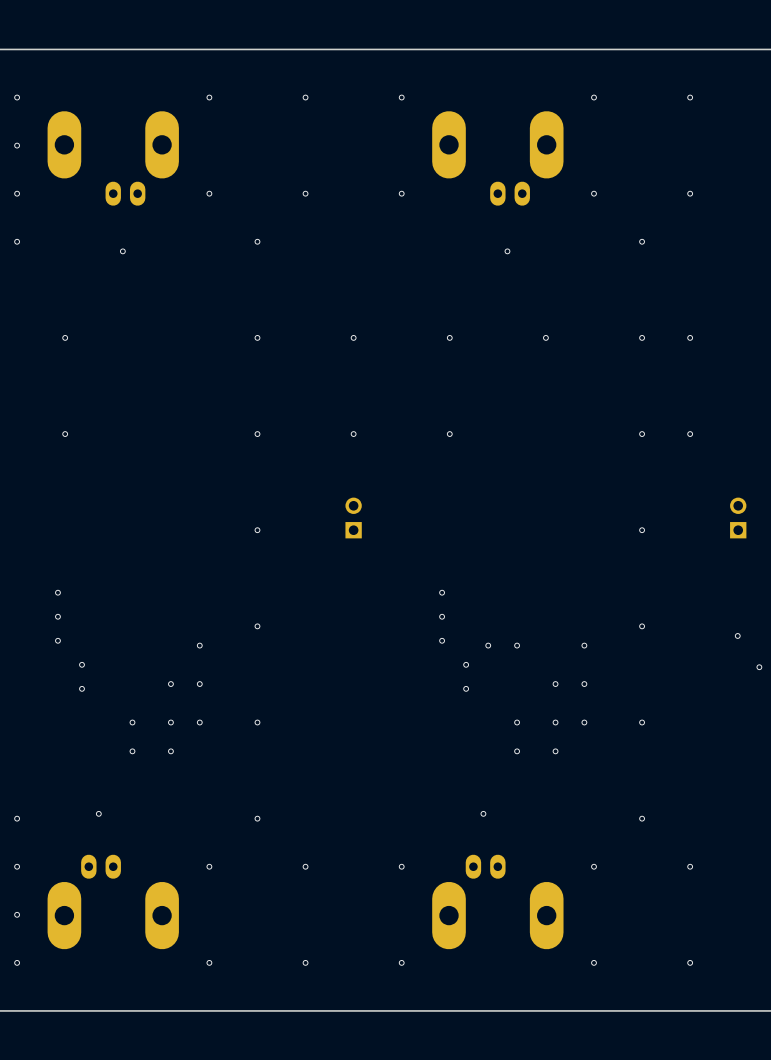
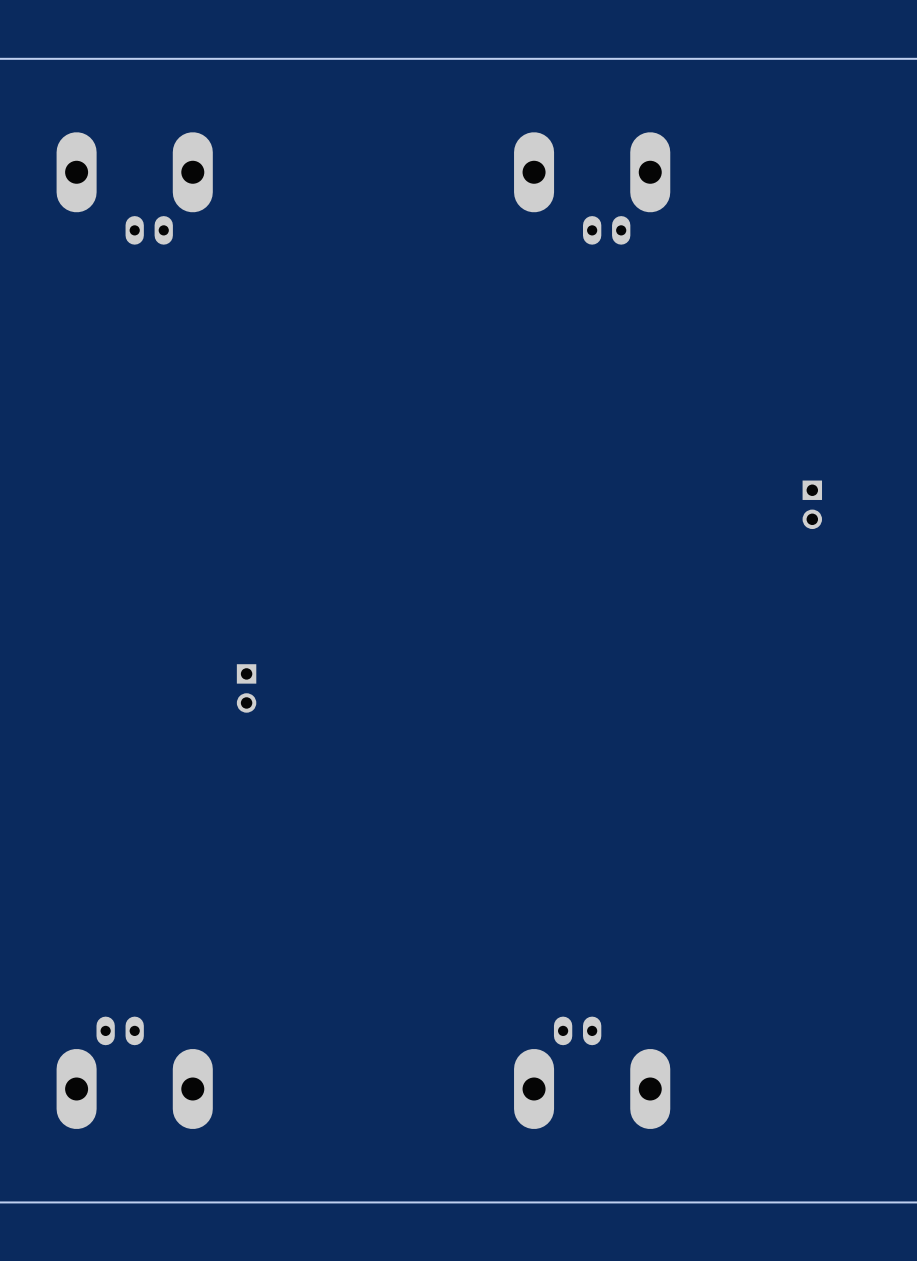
via: (17, 97) -> none
via: (209, 97) -> none
via: (305, 97) -> none
via: (401, 97) -> none
via: (594, 97) -> none
via: (690, 97) -> none
via: (17, 145) -> none
via: (17, 193) -> none
via: (209, 193) -> none
via: (305, 193) -> none
via: (401, 193) -> none
via: (594, 193) -> none
via: (690, 193) -> none
via: (17, 241) -> none
via: (257, 241) -> none
via: (642, 241) -> none
via: (122, 251) -> none
via: (507, 251) -> none
via: (65, 337) -> none
via: (257, 337) -> none
via: (353, 337) -> none
via: (449, 337) -> none
via: (545, 337) -> none
via: (642, 337) -> none
via: (690, 337) -> none
via: (65, 434) -> none
via: (257, 434) -> none
via: (353, 434) -> none
via: (449, 434) -> none
via: (642, 434) -> none
via: (690, 434) -> none
part rotation: 0° (353, 517) -> 180° (246, 688)
part position: (353, 517) -> (246, 688)
part rotation: 0° (738, 517) -> 180° (812, 504)
part position: (738, 517) -> (812, 504)
via: (257, 530) -> none
via: (642, 530) -> none
via: (57, 592) -> none
via: (442, 592) -> none
via: (57, 616) -> none
via: (442, 616) -> none
via: (257, 626) -> none
via: (642, 626) -> none
via: (737, 635) -> none
via: (57, 640) -> none
via: (442, 640) -> none
via: (199, 645) -> none
via: (488, 645) -> none
via: (517, 645) -> none
via: (584, 645) -> none
via: (82, 664) -> none
via: (466, 664) -> none
via: (759, 667) -> none
via: (170, 684) -> none
via: (199, 684) -> none
via: (555, 684) -> none
via: (584, 684) -> none
via: (82, 688) -> none
via: (466, 688) -> none
via: (132, 722) -> none
via: (170, 722) -> none
via: (199, 722) -> none
via: (257, 722) -> none
via: (517, 722) -> none
via: (555, 722) -> none
via: (584, 722) -> none
via: (642, 722) -> none
via: (132, 751) -> none
via: (170, 751) -> none
via: (517, 751) -> none
via: (555, 751) -> none
via: (98, 813) -> none
via: (483, 813) -> none
via: (17, 818) -> none
via: (257, 818) -> none
via: (642, 818) -> none
via: (17, 866) -> none
via: (209, 866) -> none
via: (305, 866) -> none
via: (401, 866) -> none
via: (594, 866) -> none
via: (690, 866) -> none
via: (17, 914) -> none
via: (17, 962) -> none
via: (209, 962) -> none
via: (305, 962) -> none
via: (401, 962) -> none
via: (594, 962) -> none
via: (690, 962) -> none

